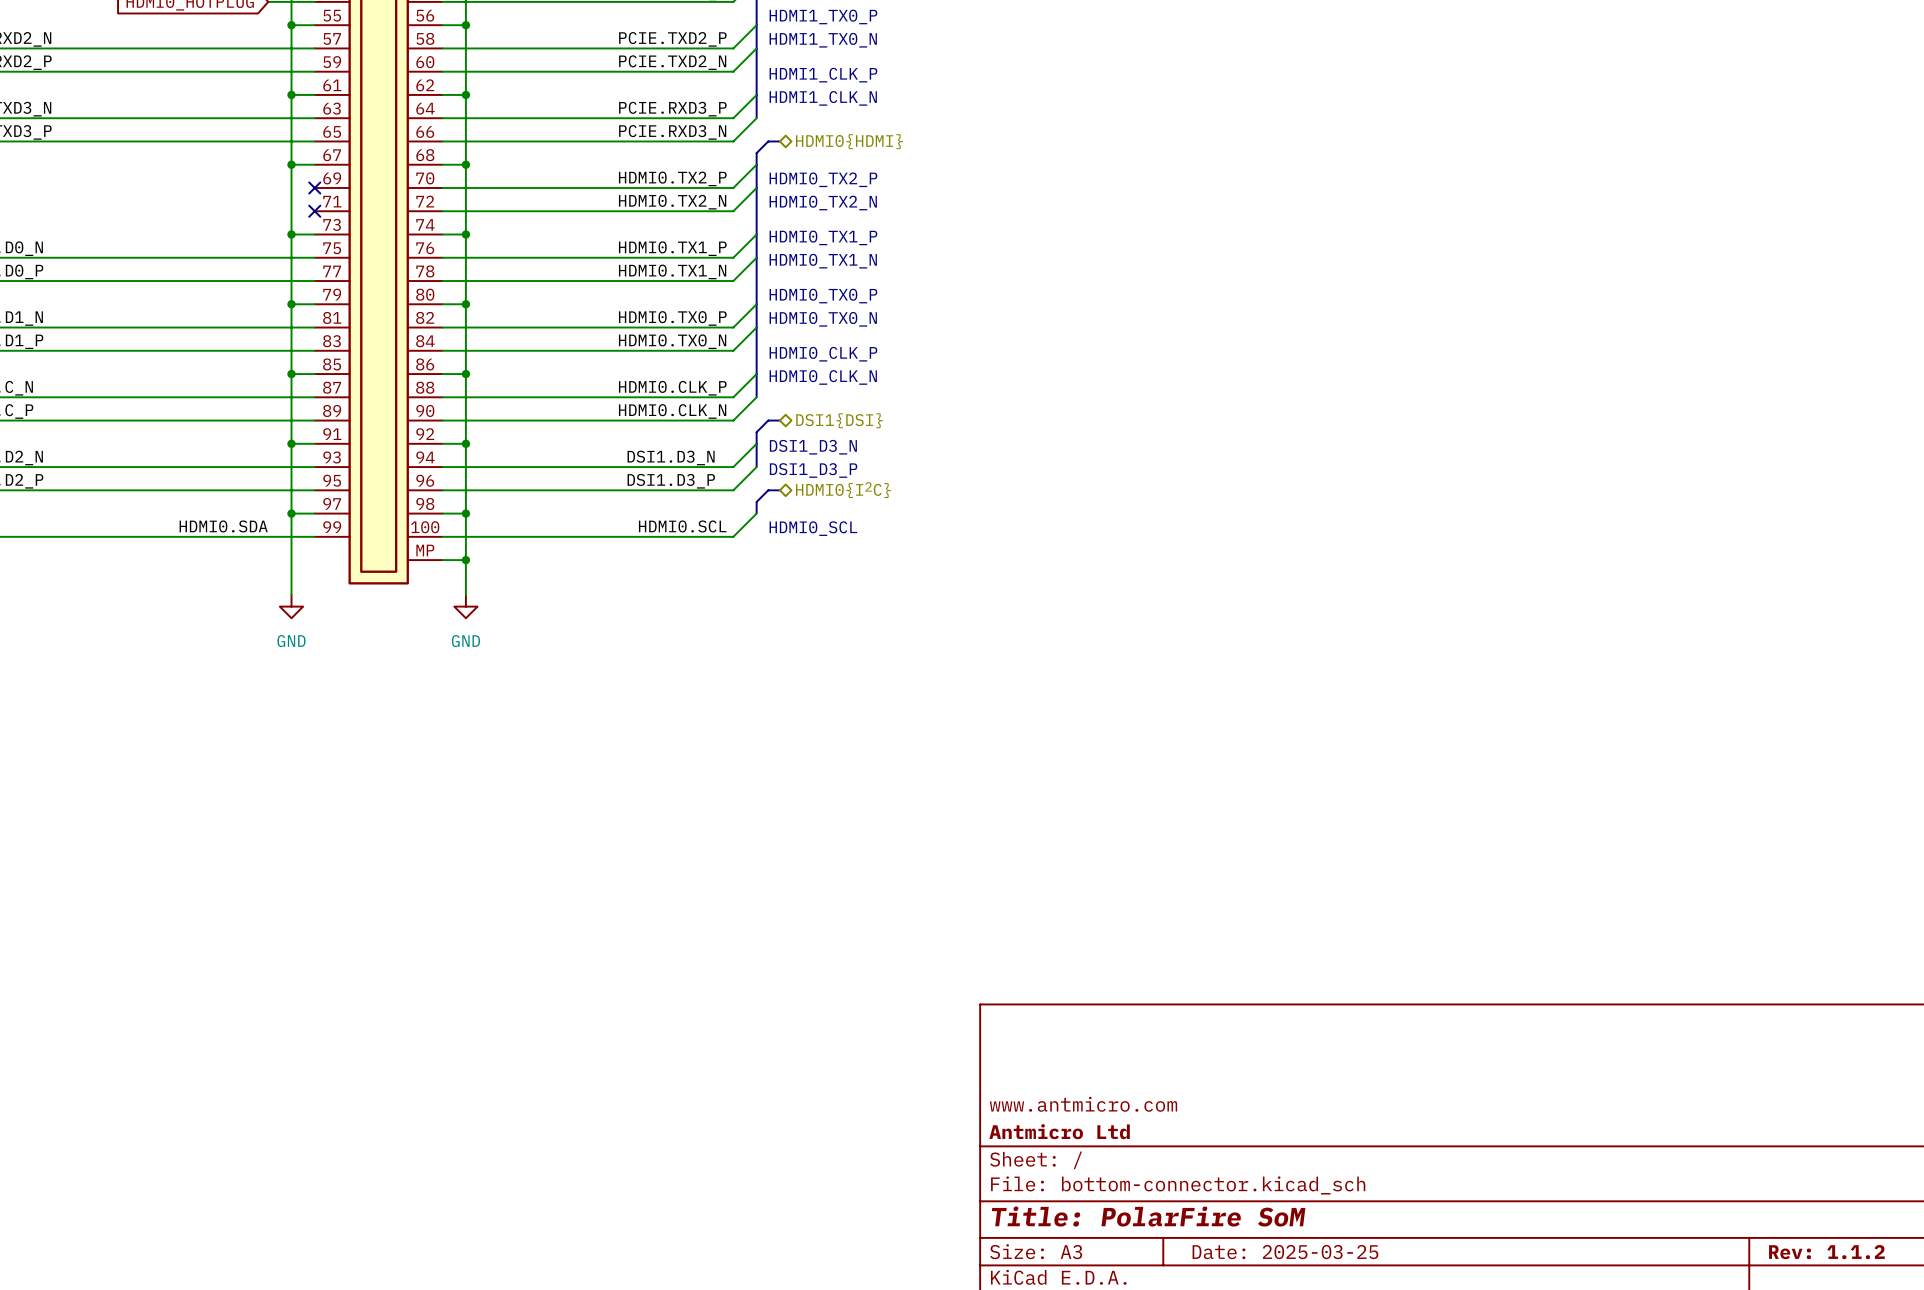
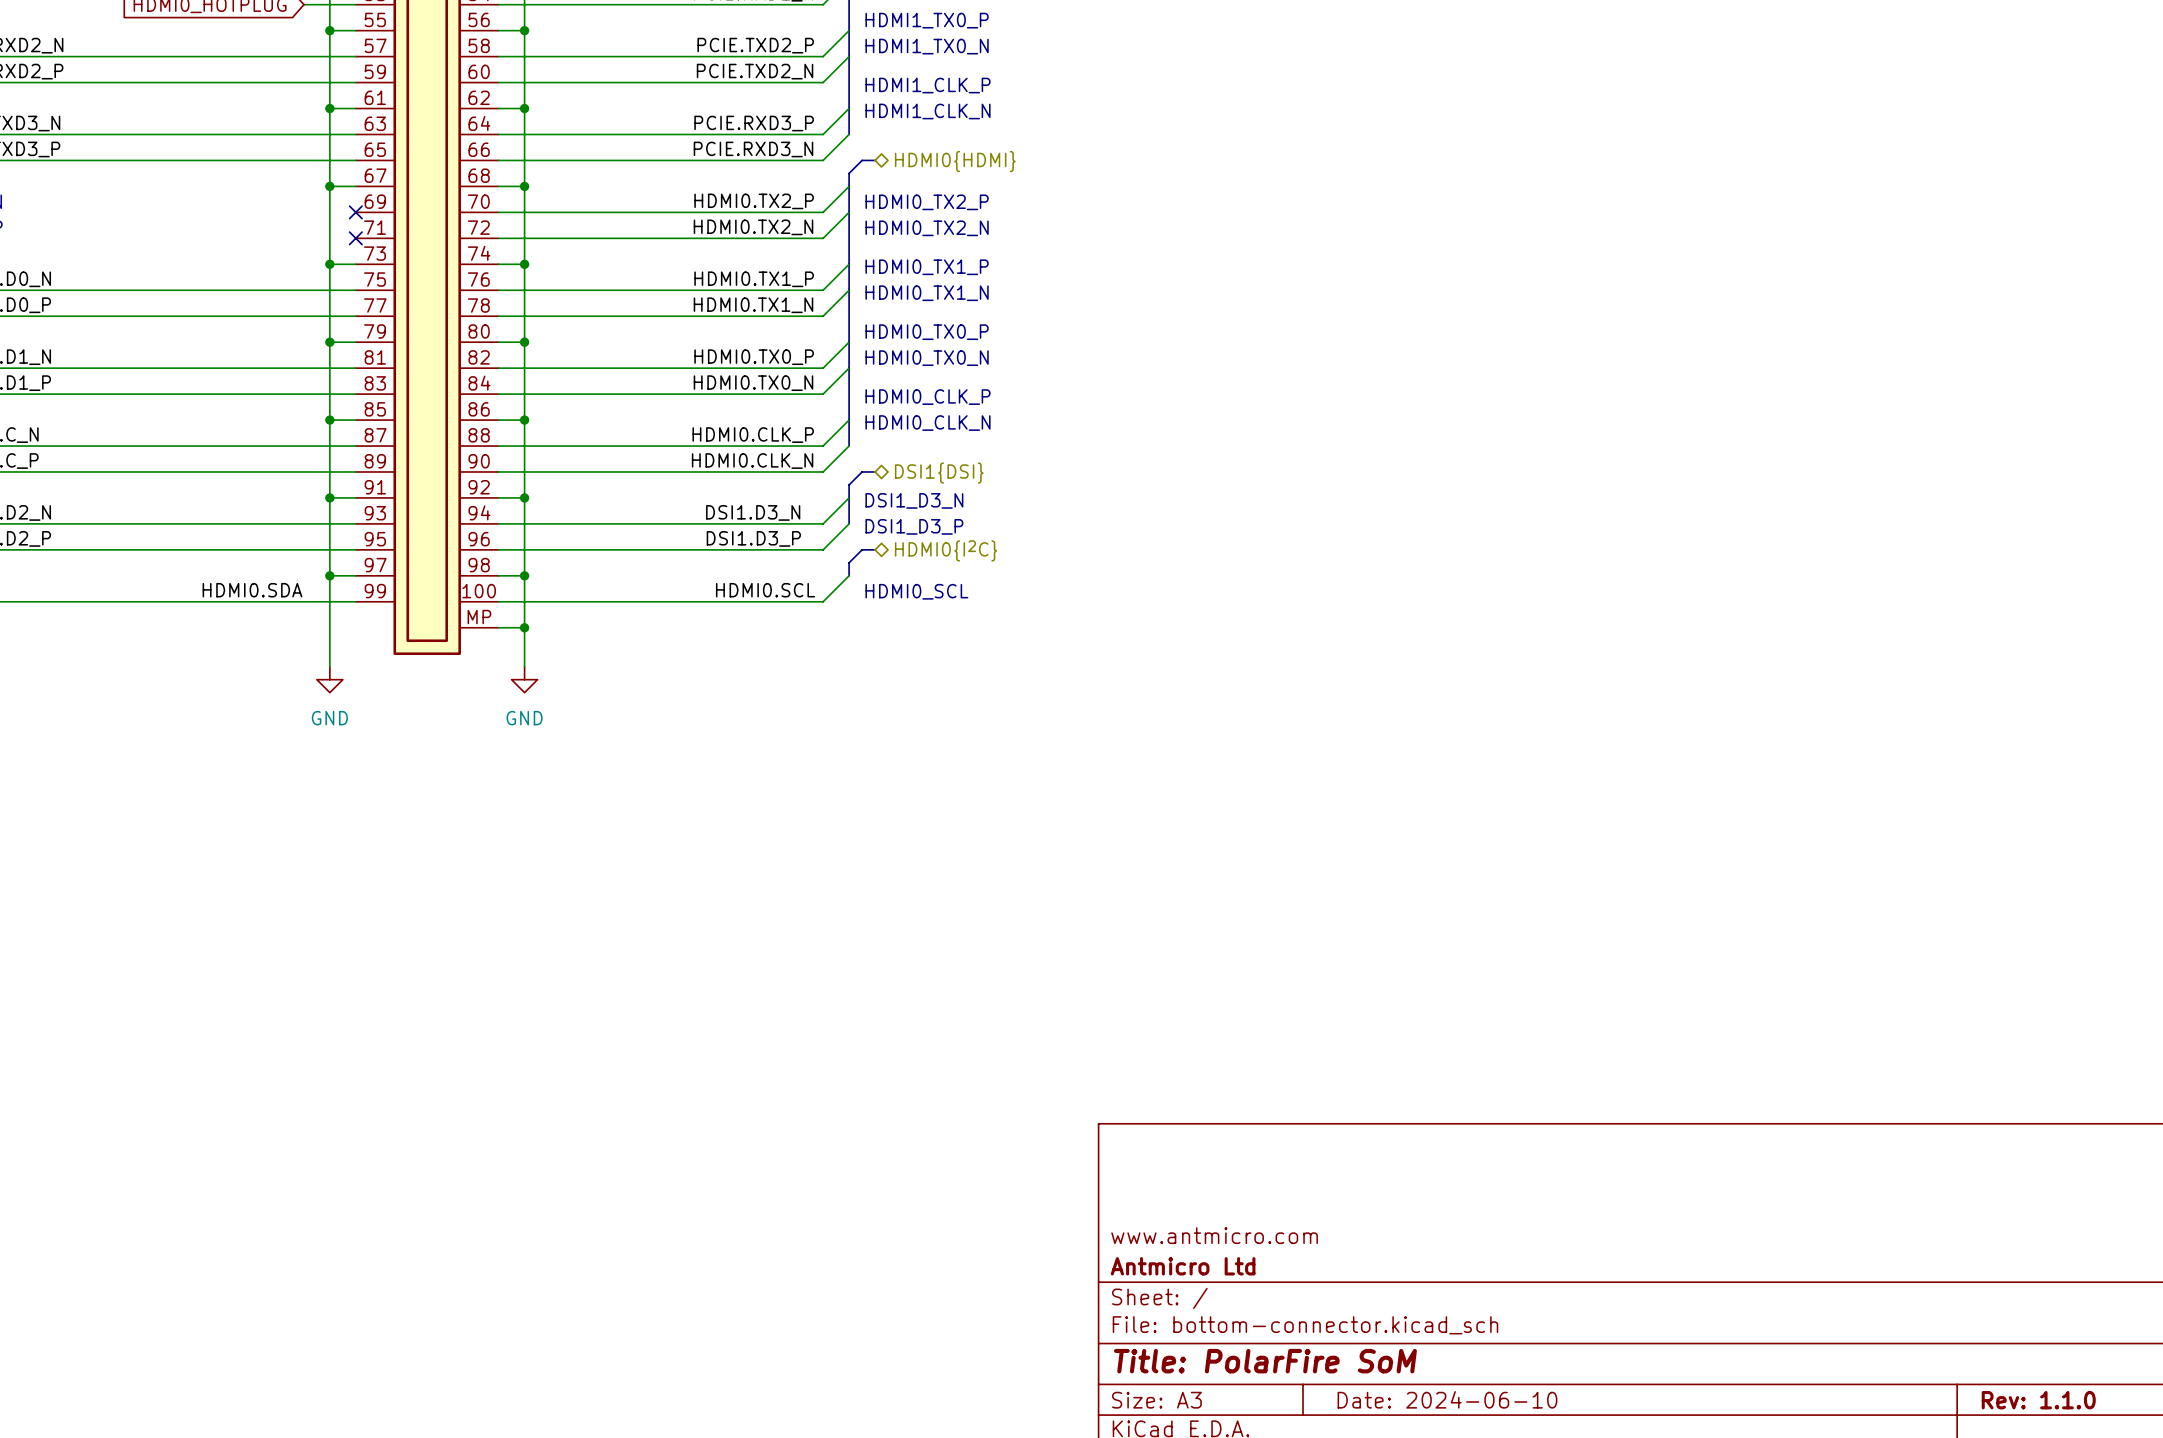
title block: Date: 2025-03-25 (1285, 1252) -> Date: 2024-06-10 (1447, 1399)
title block: Rev: 1.1.2 (1826, 1252) -> Rev: 1.1.0 (2038, 1400)

